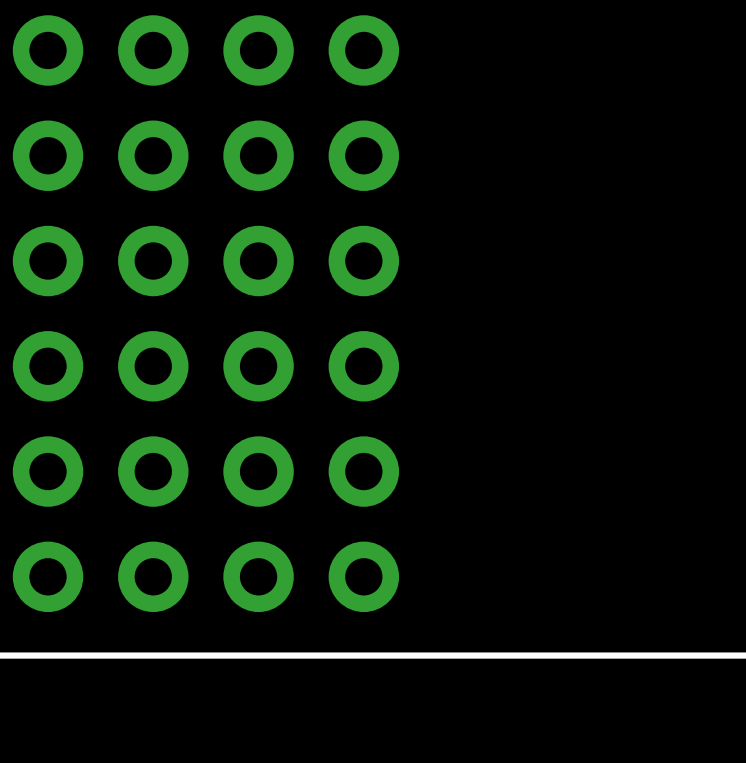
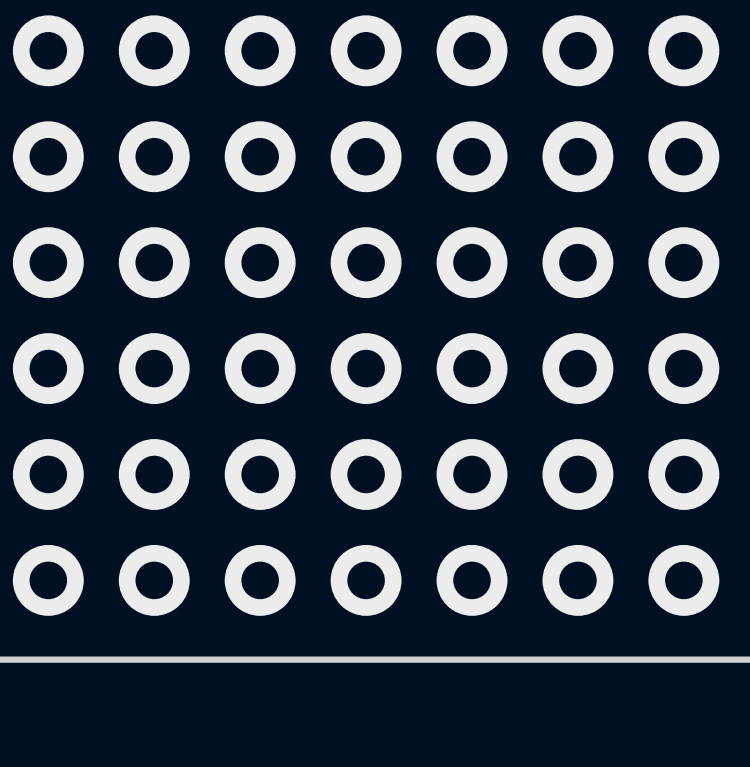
via: none -> (472, 50)
via: none -> (577, 50)
via: none -> (683, 50)
via: none -> (472, 156)
via: none -> (577, 156)
via: none -> (683, 156)
via: none -> (472, 262)
via: none -> (577, 262)
via: none -> (683, 262)
via: none -> (472, 368)
via: none -> (577, 368)
via: none -> (683, 368)
via: none -> (472, 474)
via: none -> (577, 474)
via: none -> (683, 474)
via: none -> (472, 580)
via: none -> (577, 580)
via: none -> (683, 580)

